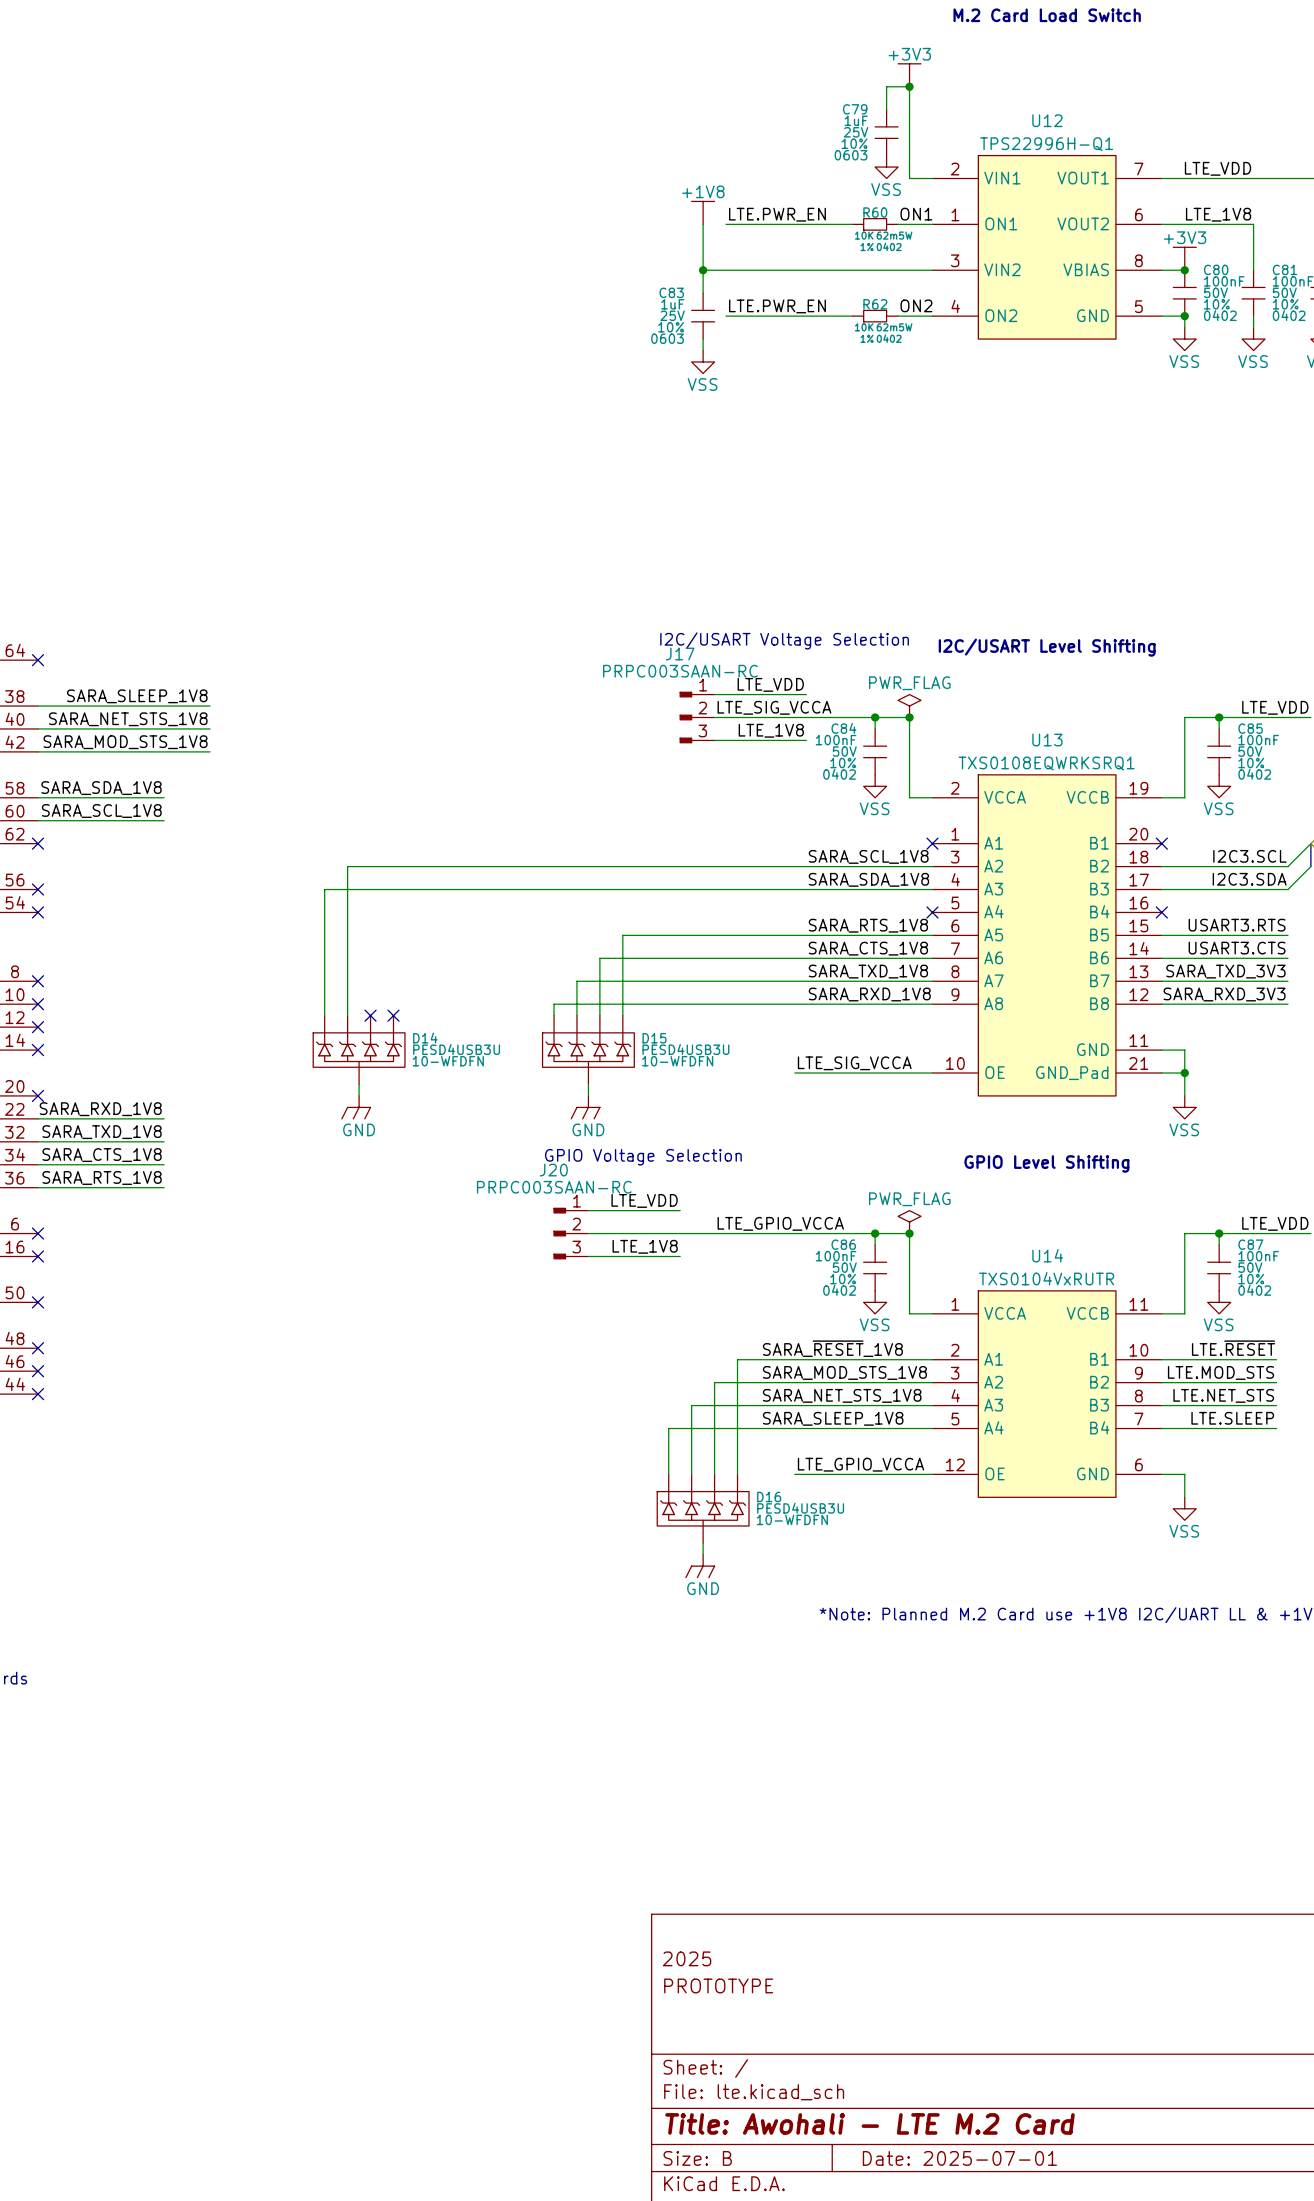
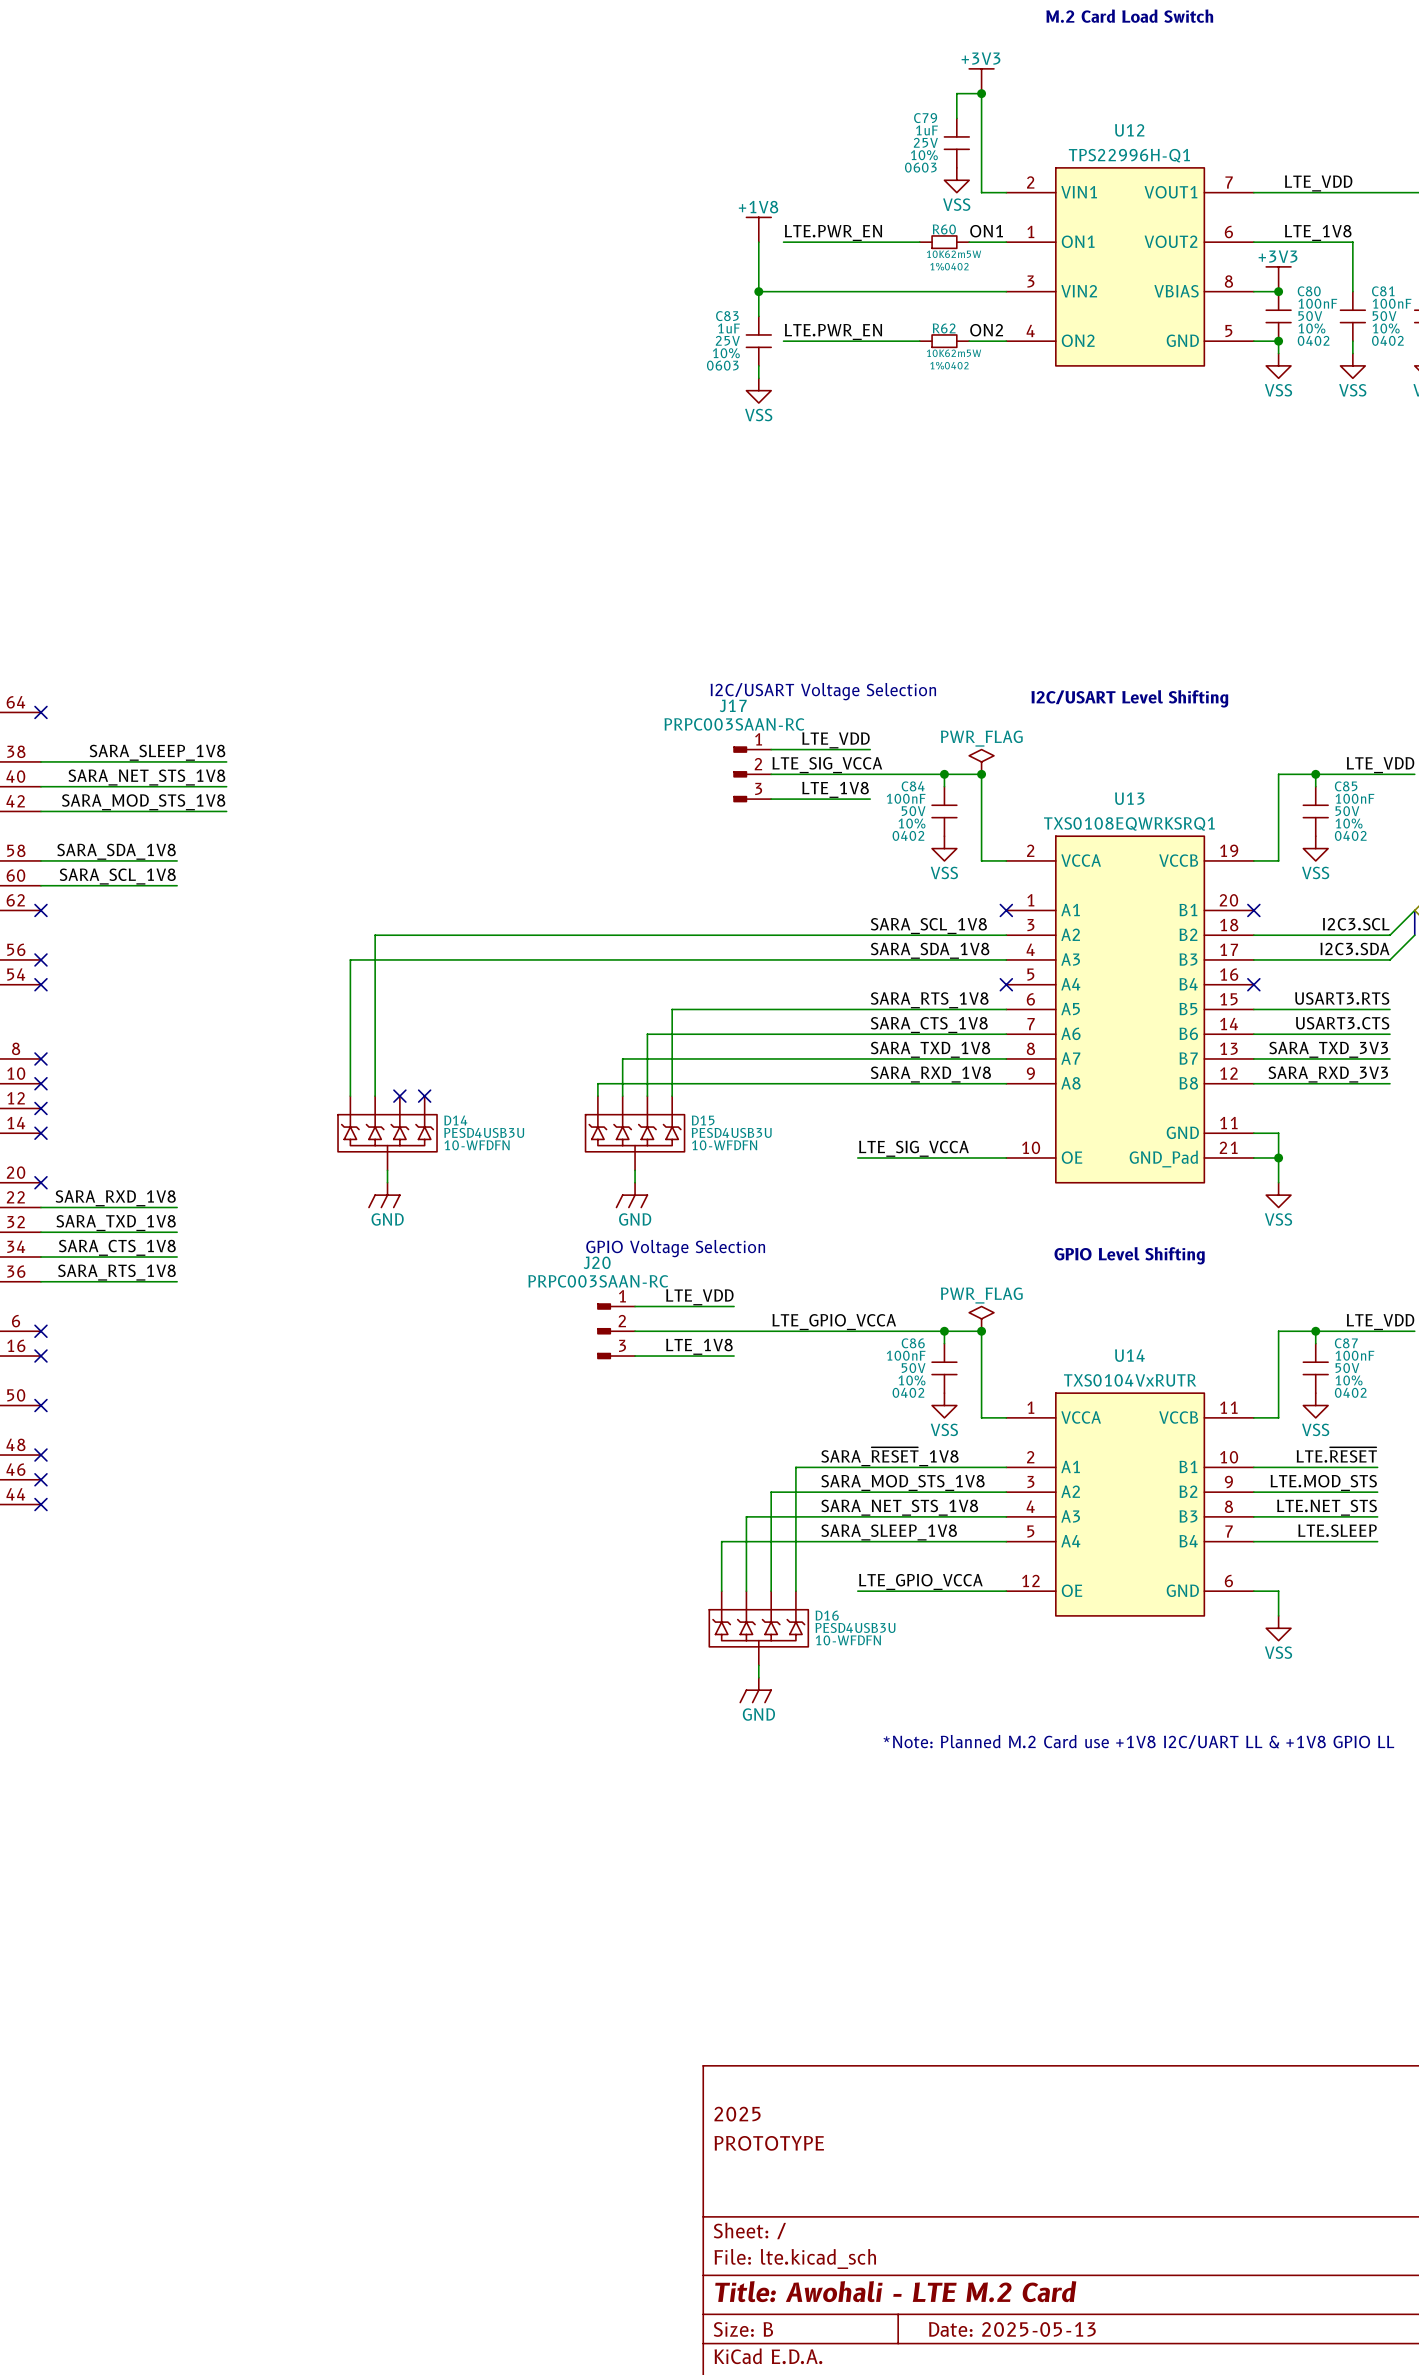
title block: Date: 2025-07-01 (959, 2158) -> Date: 2025-05-13 (1012, 2329)

